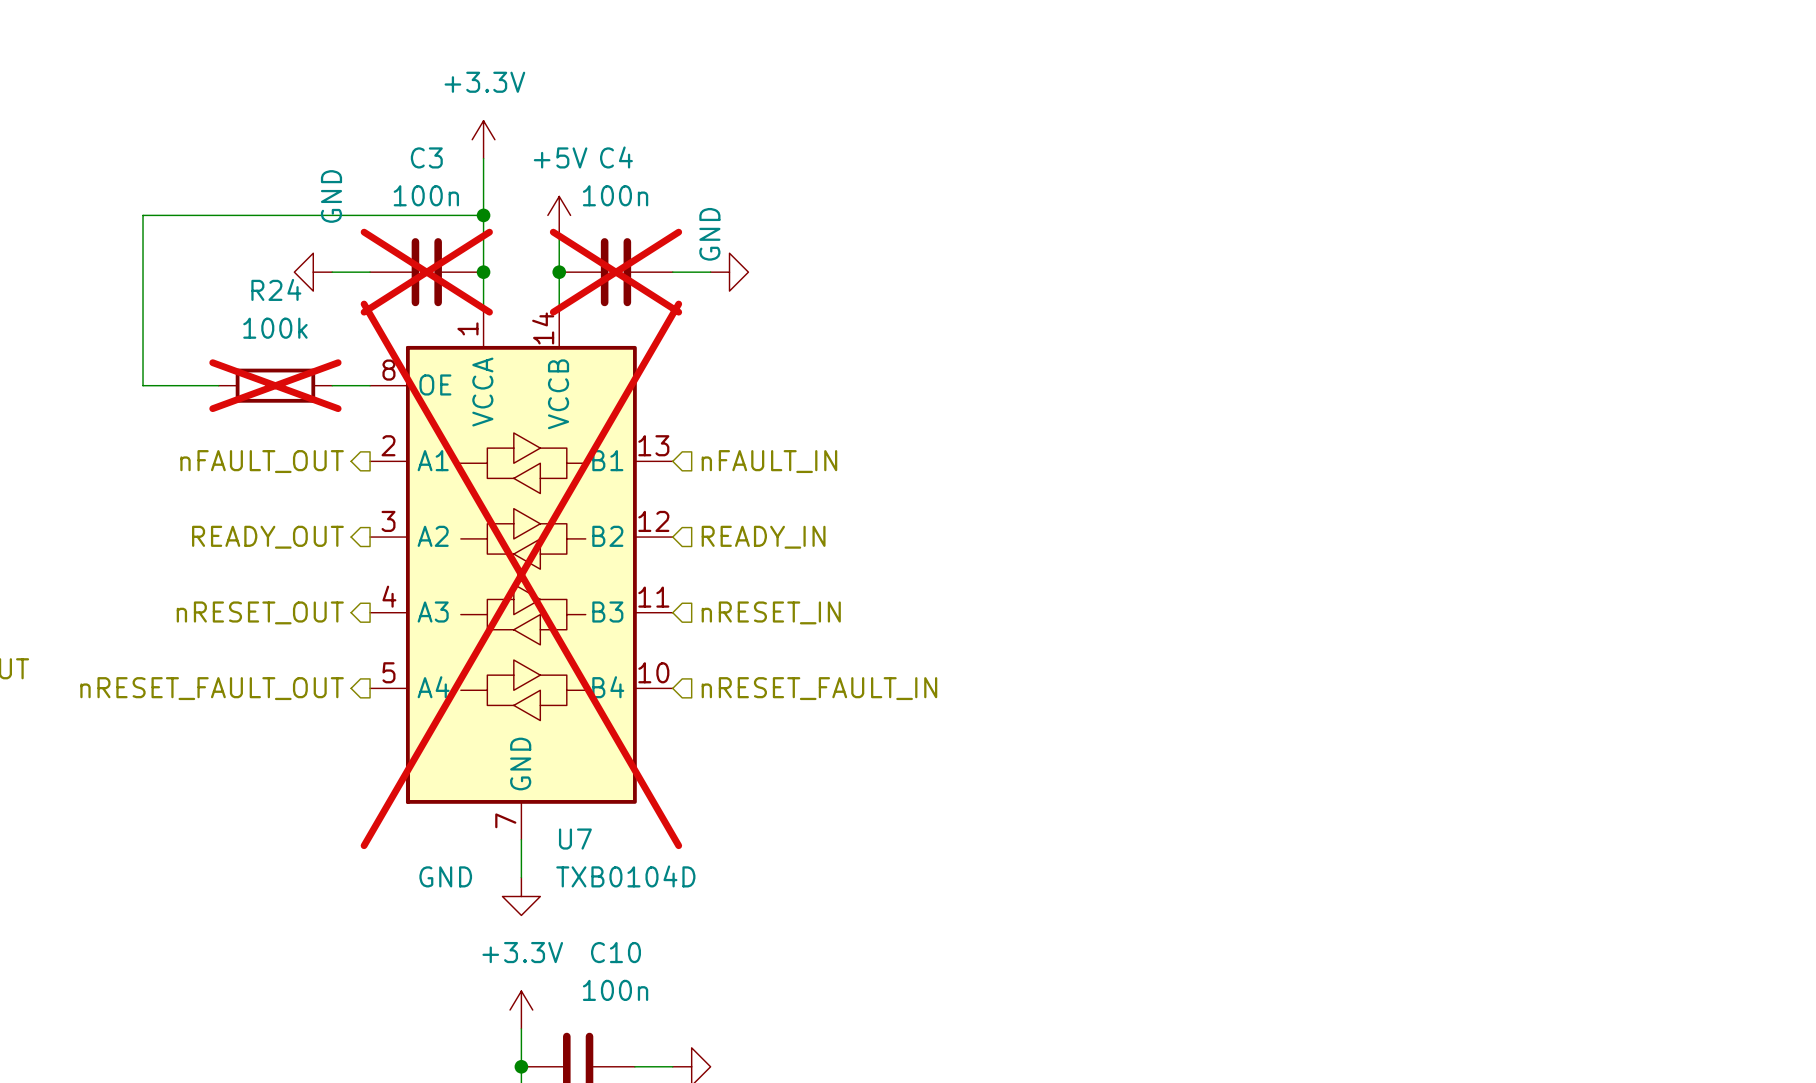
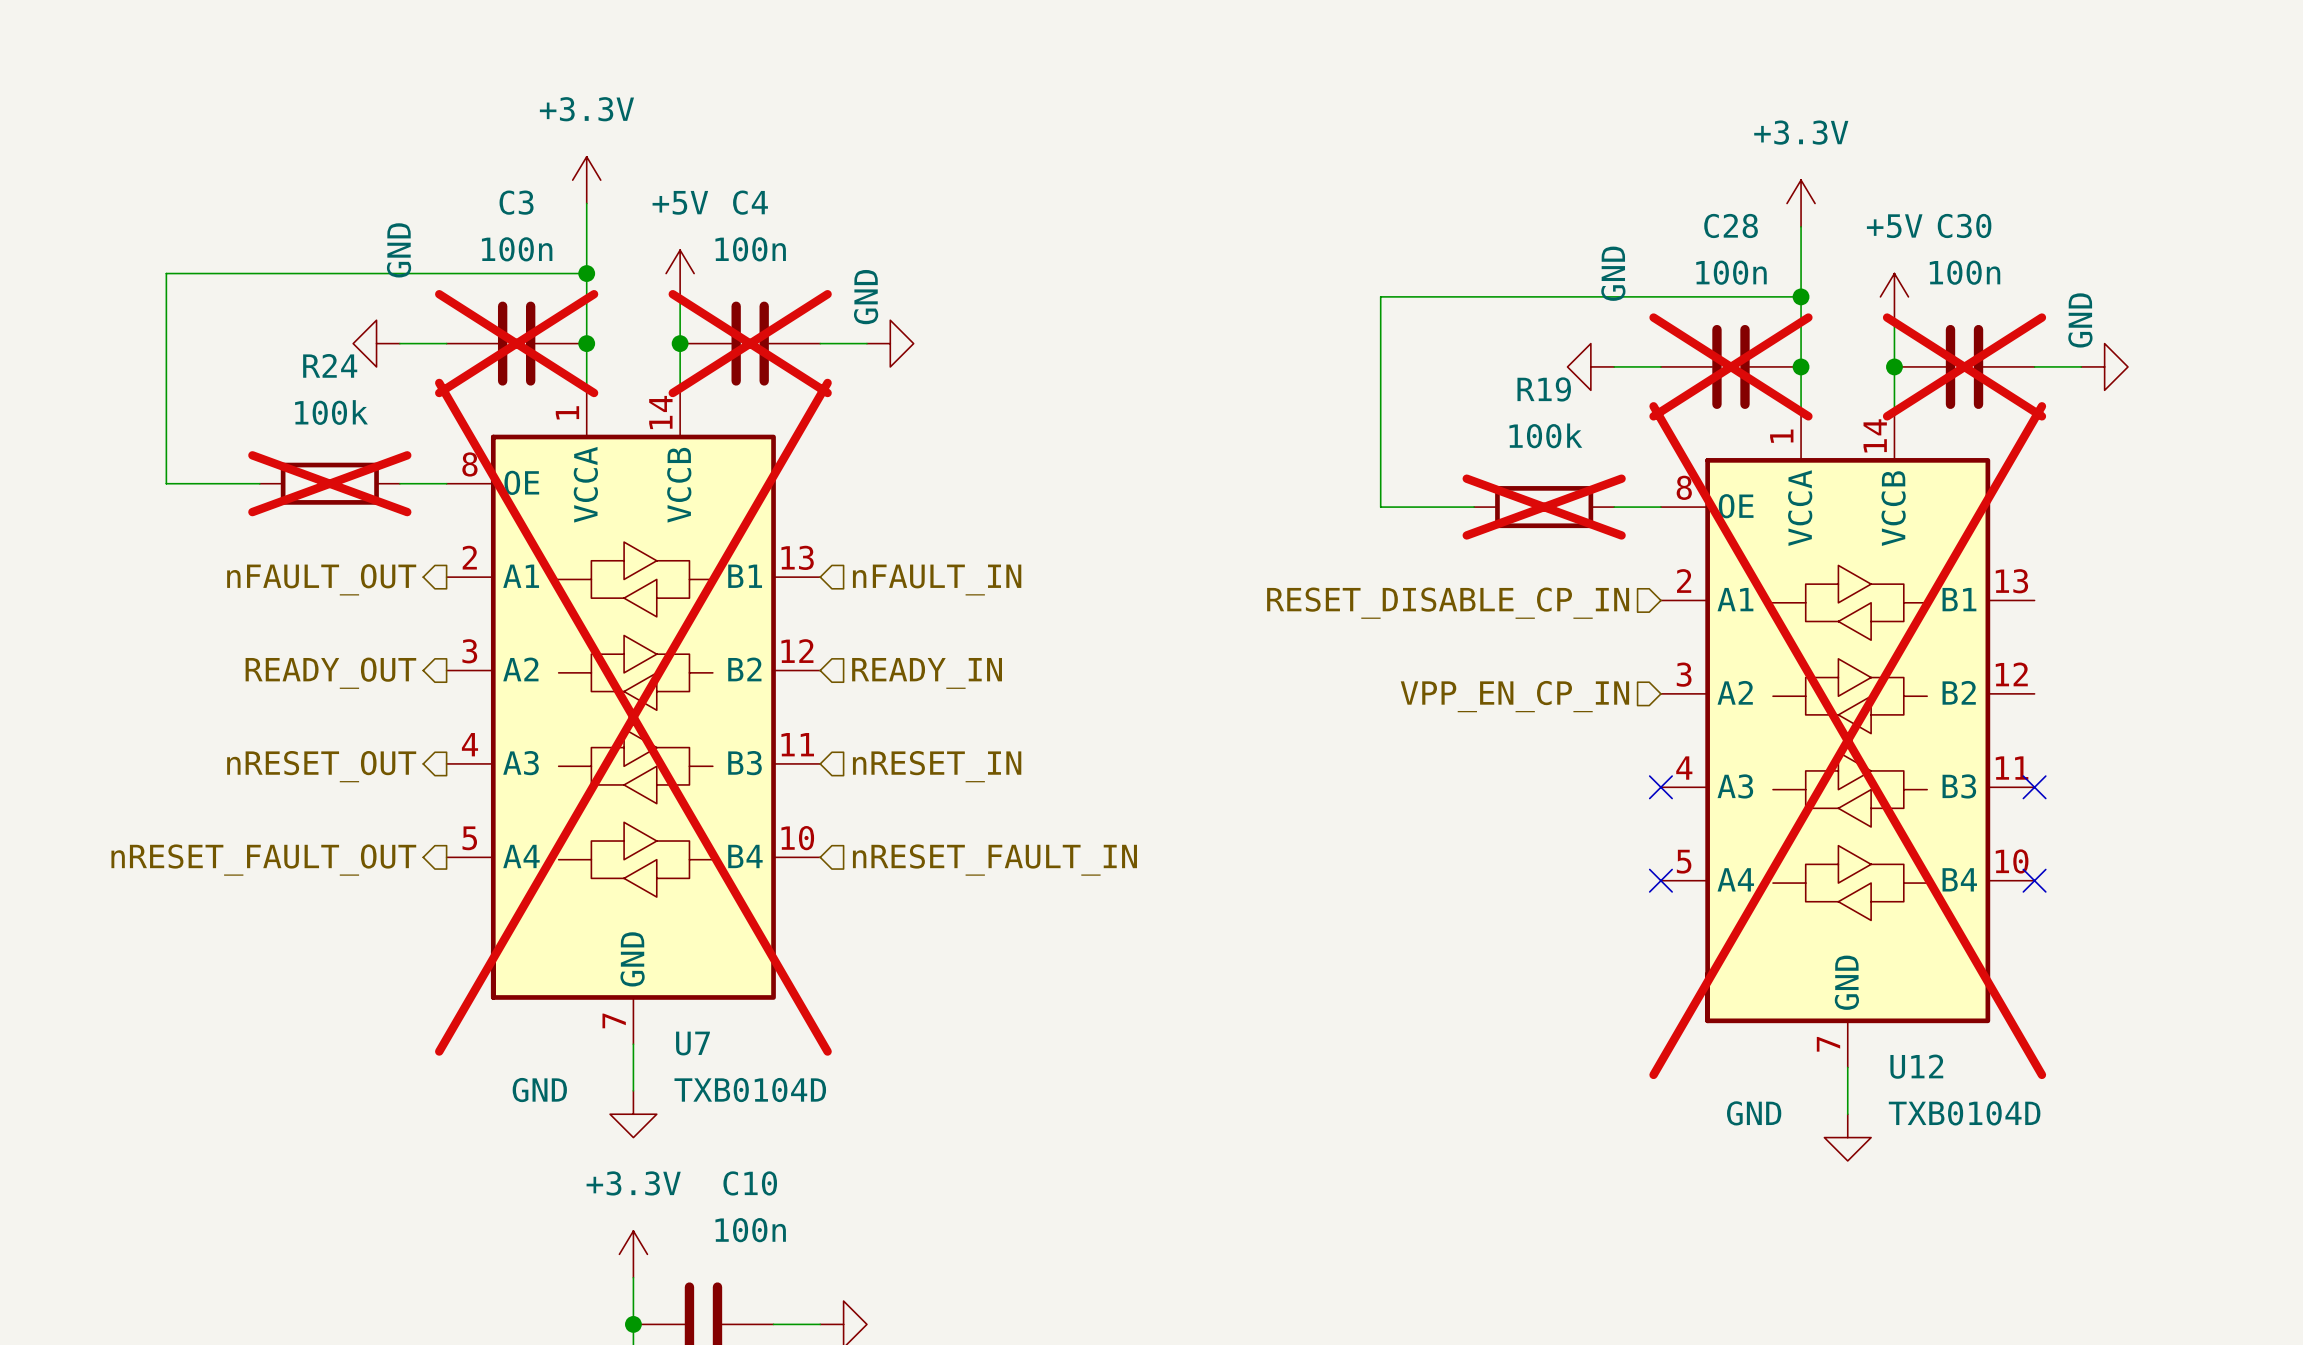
power symbol: none -> +3.3V (1801, 203)
wire: none -> (1801, 226) (1801, 413)
wire: none -> (1801, 296) (1380, 296) (1380, 507) (1474, 507)
junction: none -> (1801, 296)
power symbol: none -> +5V (1894, 296)
wire: none -> (1894, 320) (1894, 413)
power symbol: none -> GND (1590, 366)
wire: none -> (1614, 366) (1660, 366)
C28: none -> 100n (1730, 366)
junction: none -> (1801, 366)
junction: none -> (1894, 366)
C30: none -> 100n (1964, 366)
wire: none -> (2034, 366) (2081, 366)
power symbol: none -> GND (2104, 366)
R19: none -> 100k (1544, 507)
wire: none -> (1614, 507) (1660, 507)
hierarchical label: none -> RESET_DISABLE_CP_IN (1448, 603)
hierarchical label: none -> VPP_EN_CP_IN (1514, 696)
U12: none -> TXB0104D (1847, 740)
no-connect mark: none -> (1660, 787)
no-connect mark: none -> (2034, 787)
no-connect mark: none -> (1660, 880)
no-connect mark: none -> (2034, 880)
wire: none -> (1847, 1067) (1847, 1114)
power symbol: none -> GND (1847, 1137)

